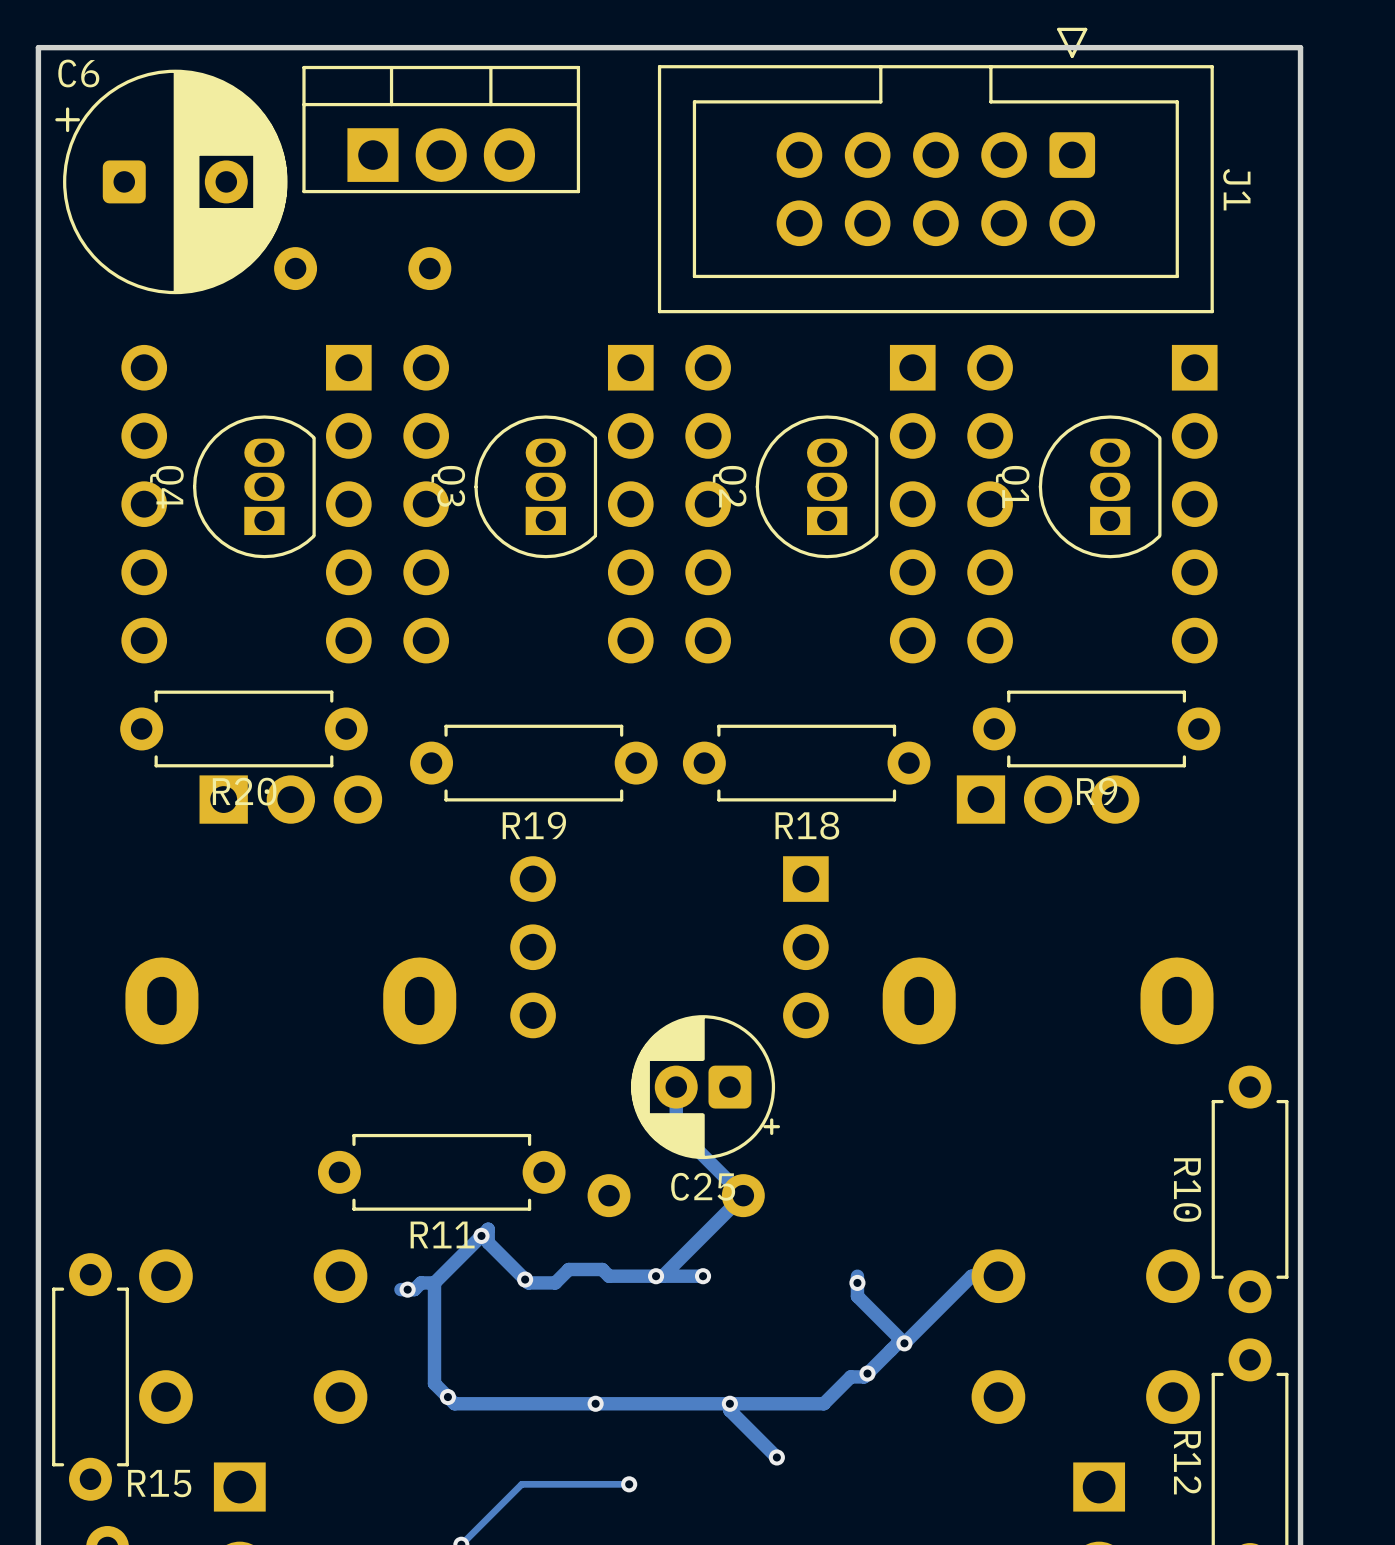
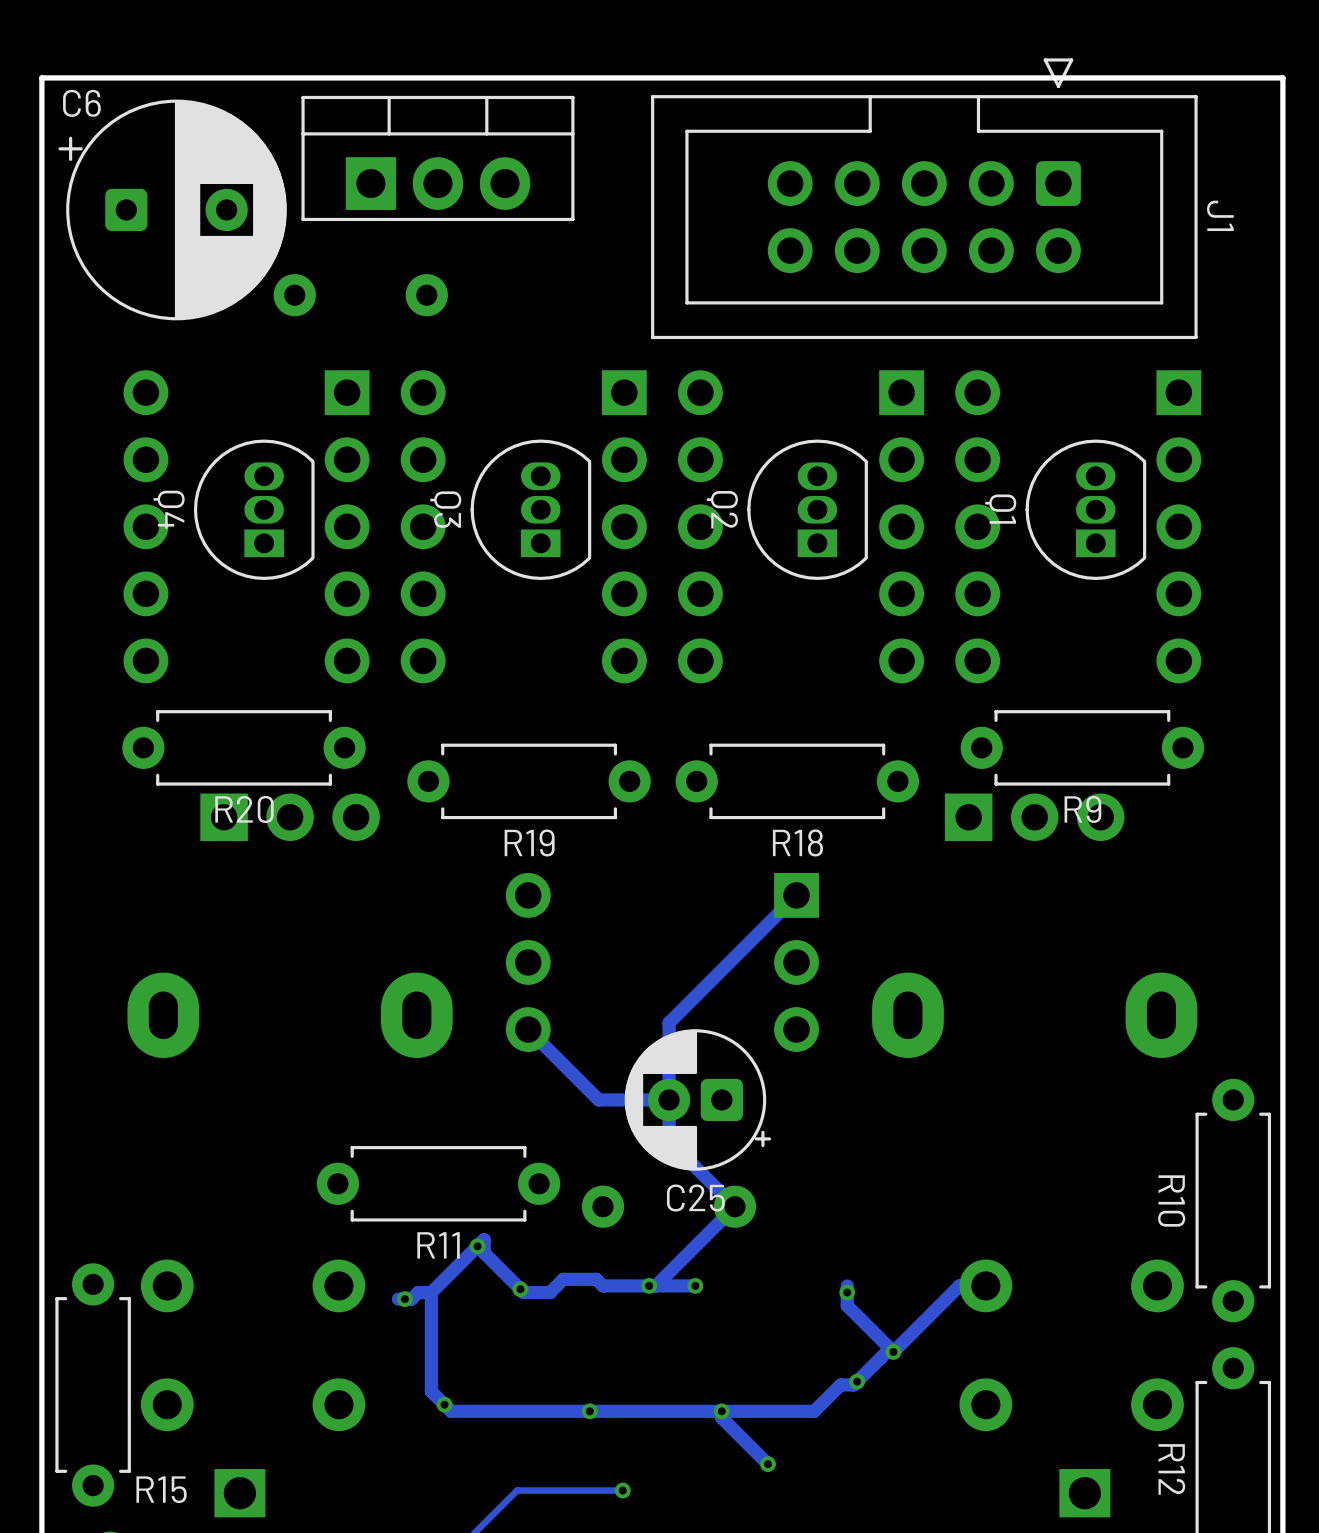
track: none -> (796, 895) (669, 1022) (669, 1099) (598, 1099) (528, 1029)

